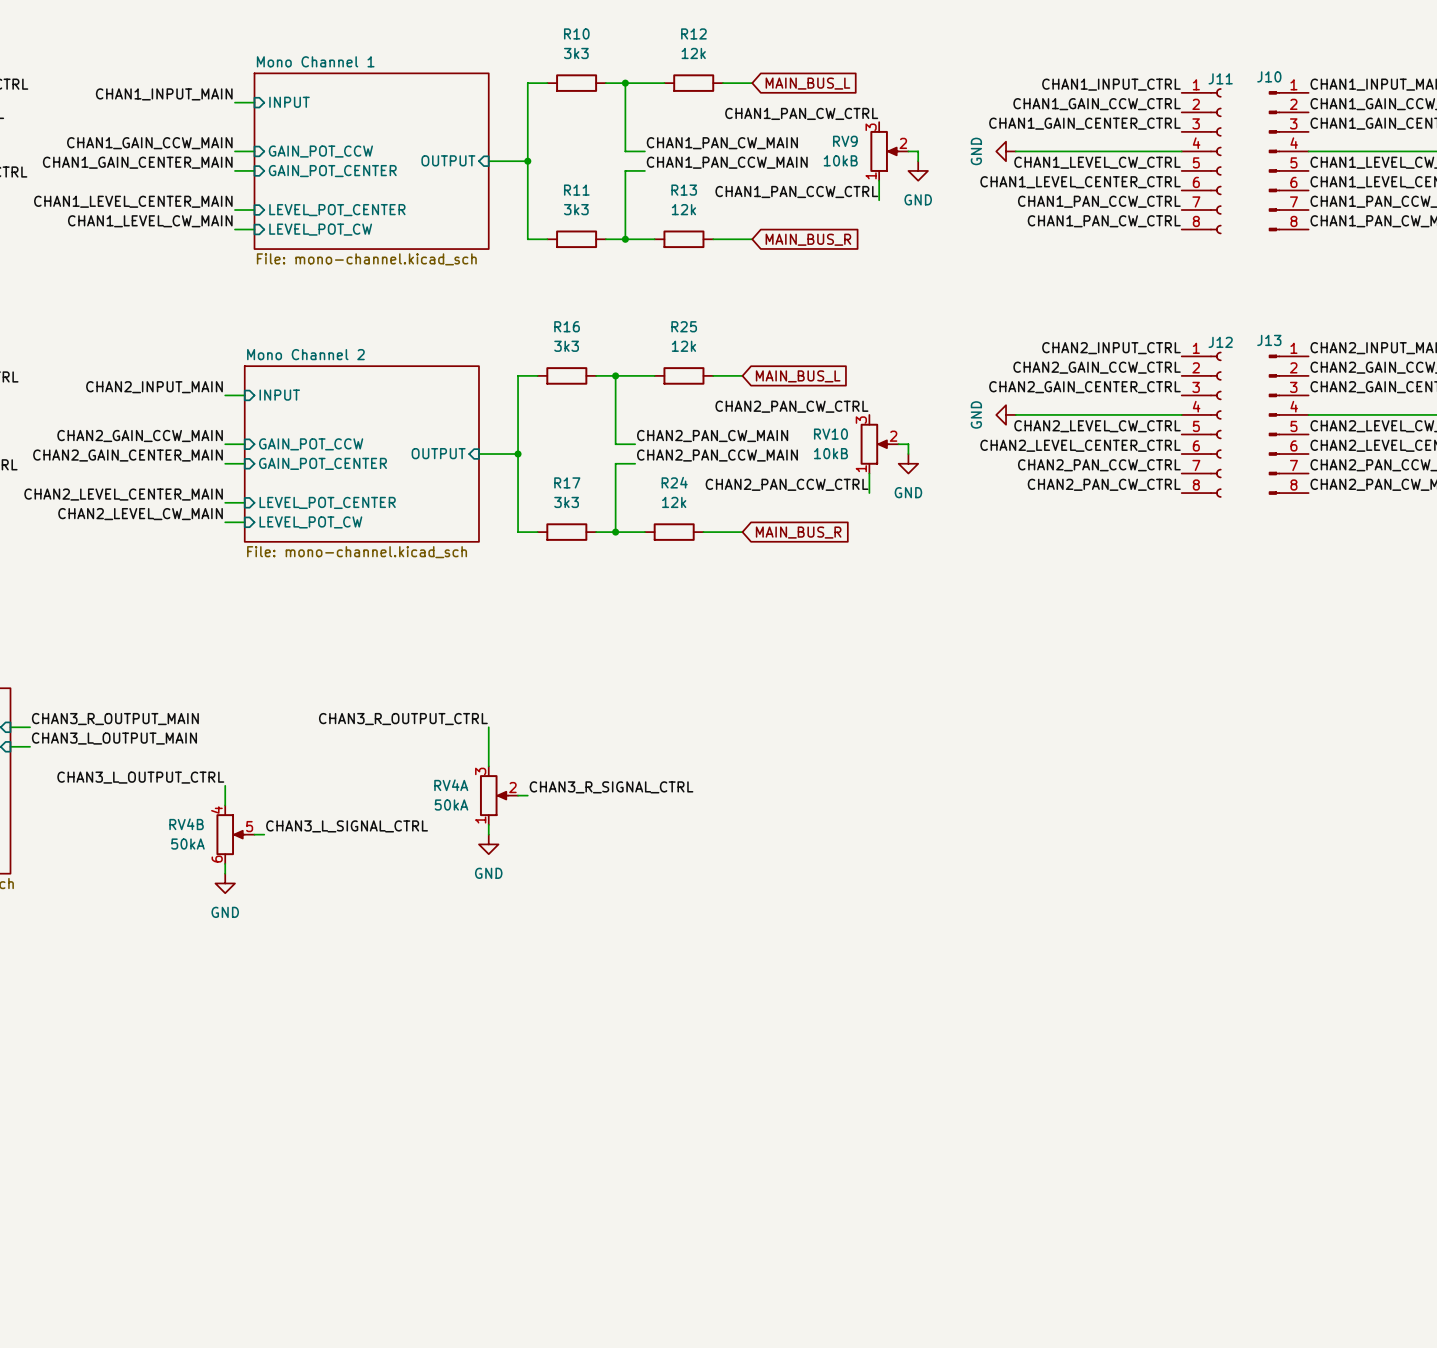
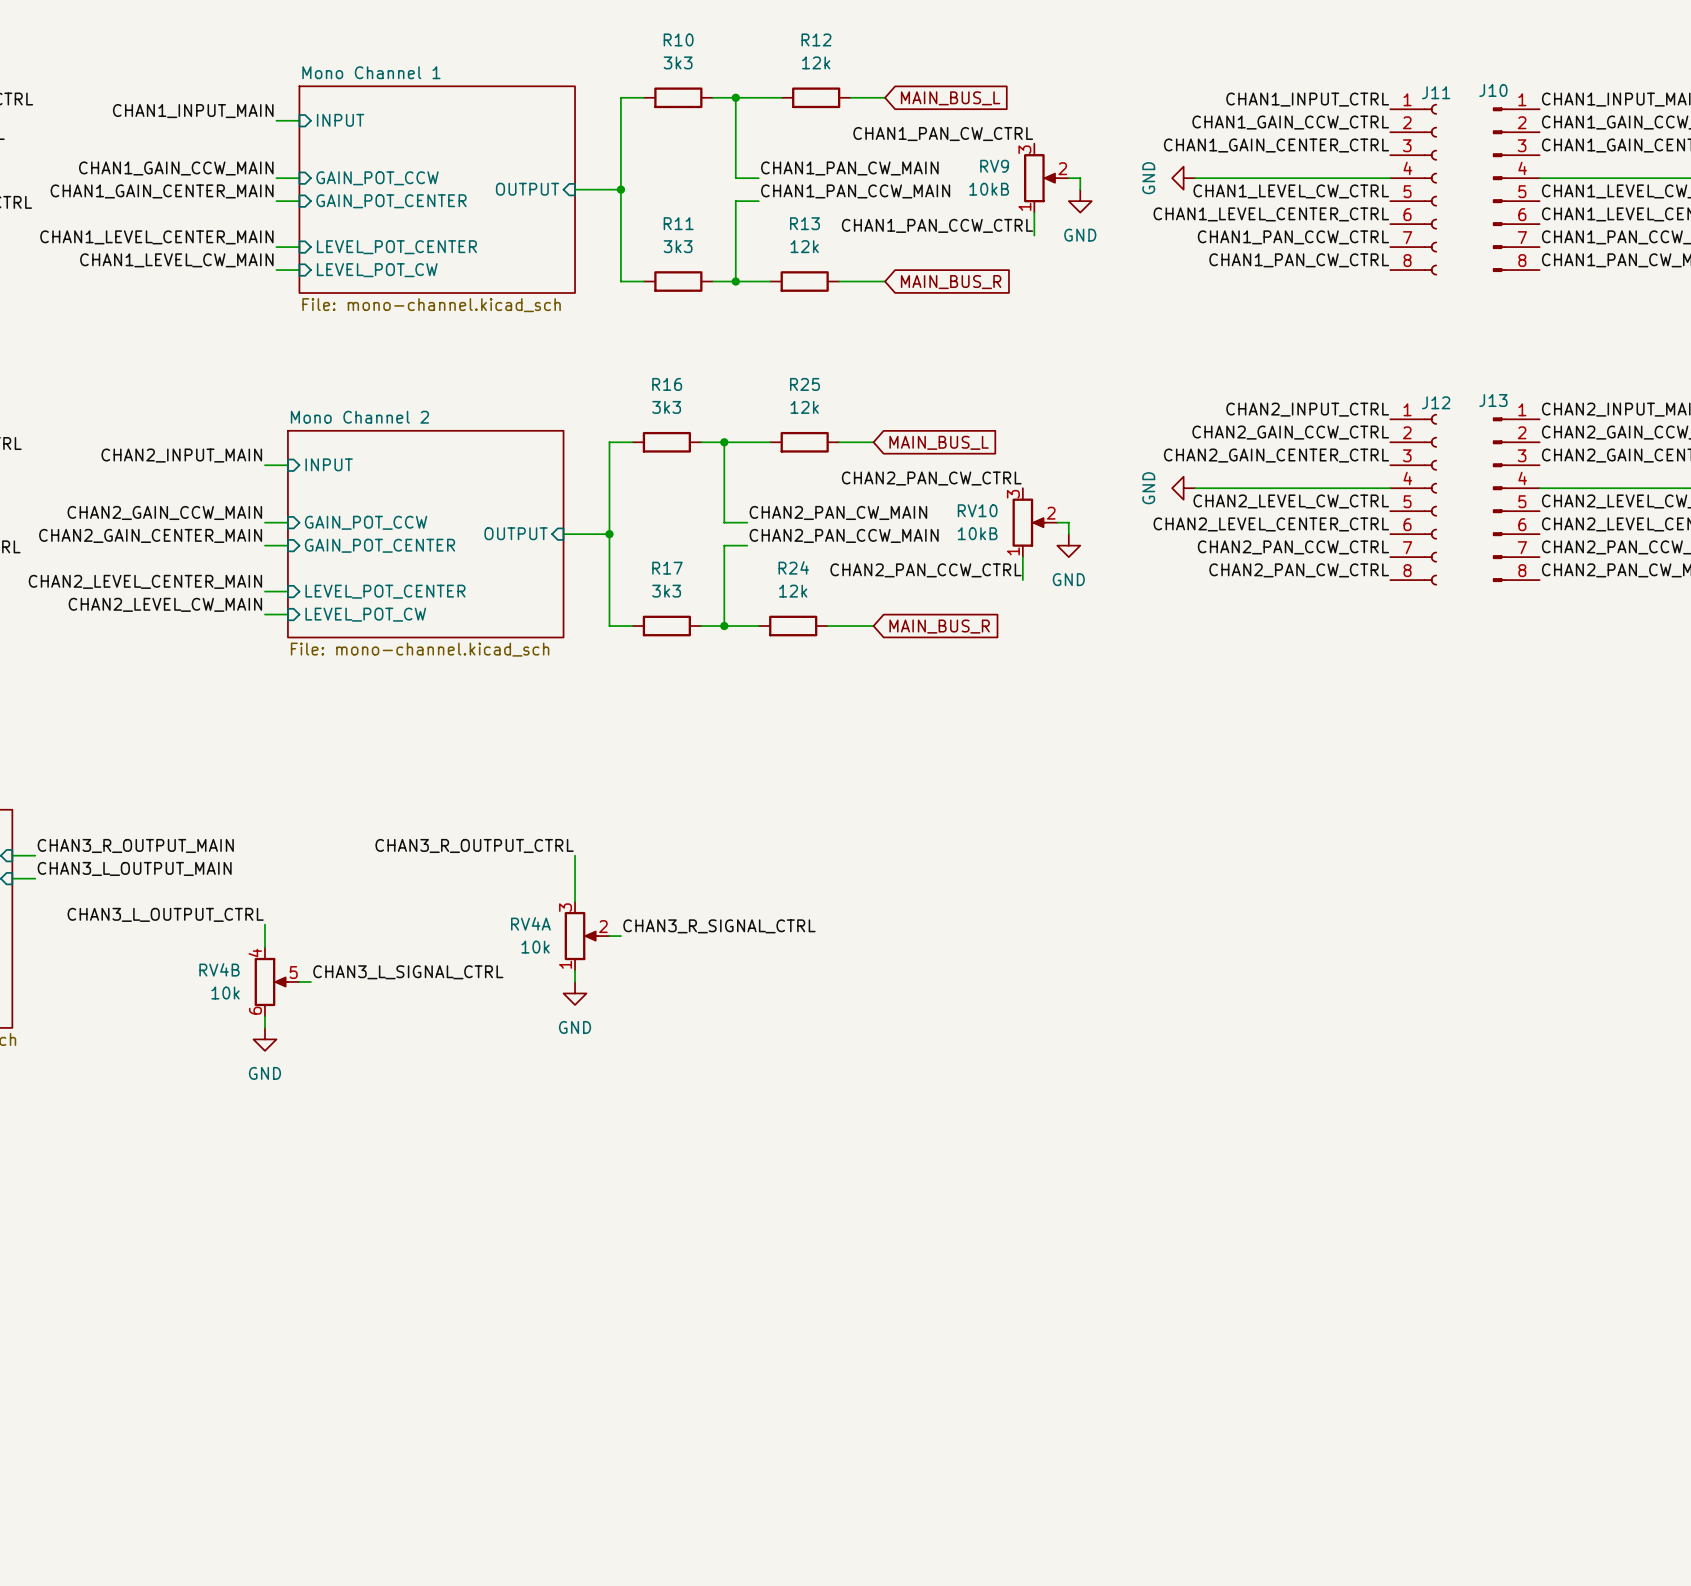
RV4A value: 50kA (451, 805) -> 10k (535, 947)
RV4B value: 50kA (187, 844) -> 10k (225, 993)

